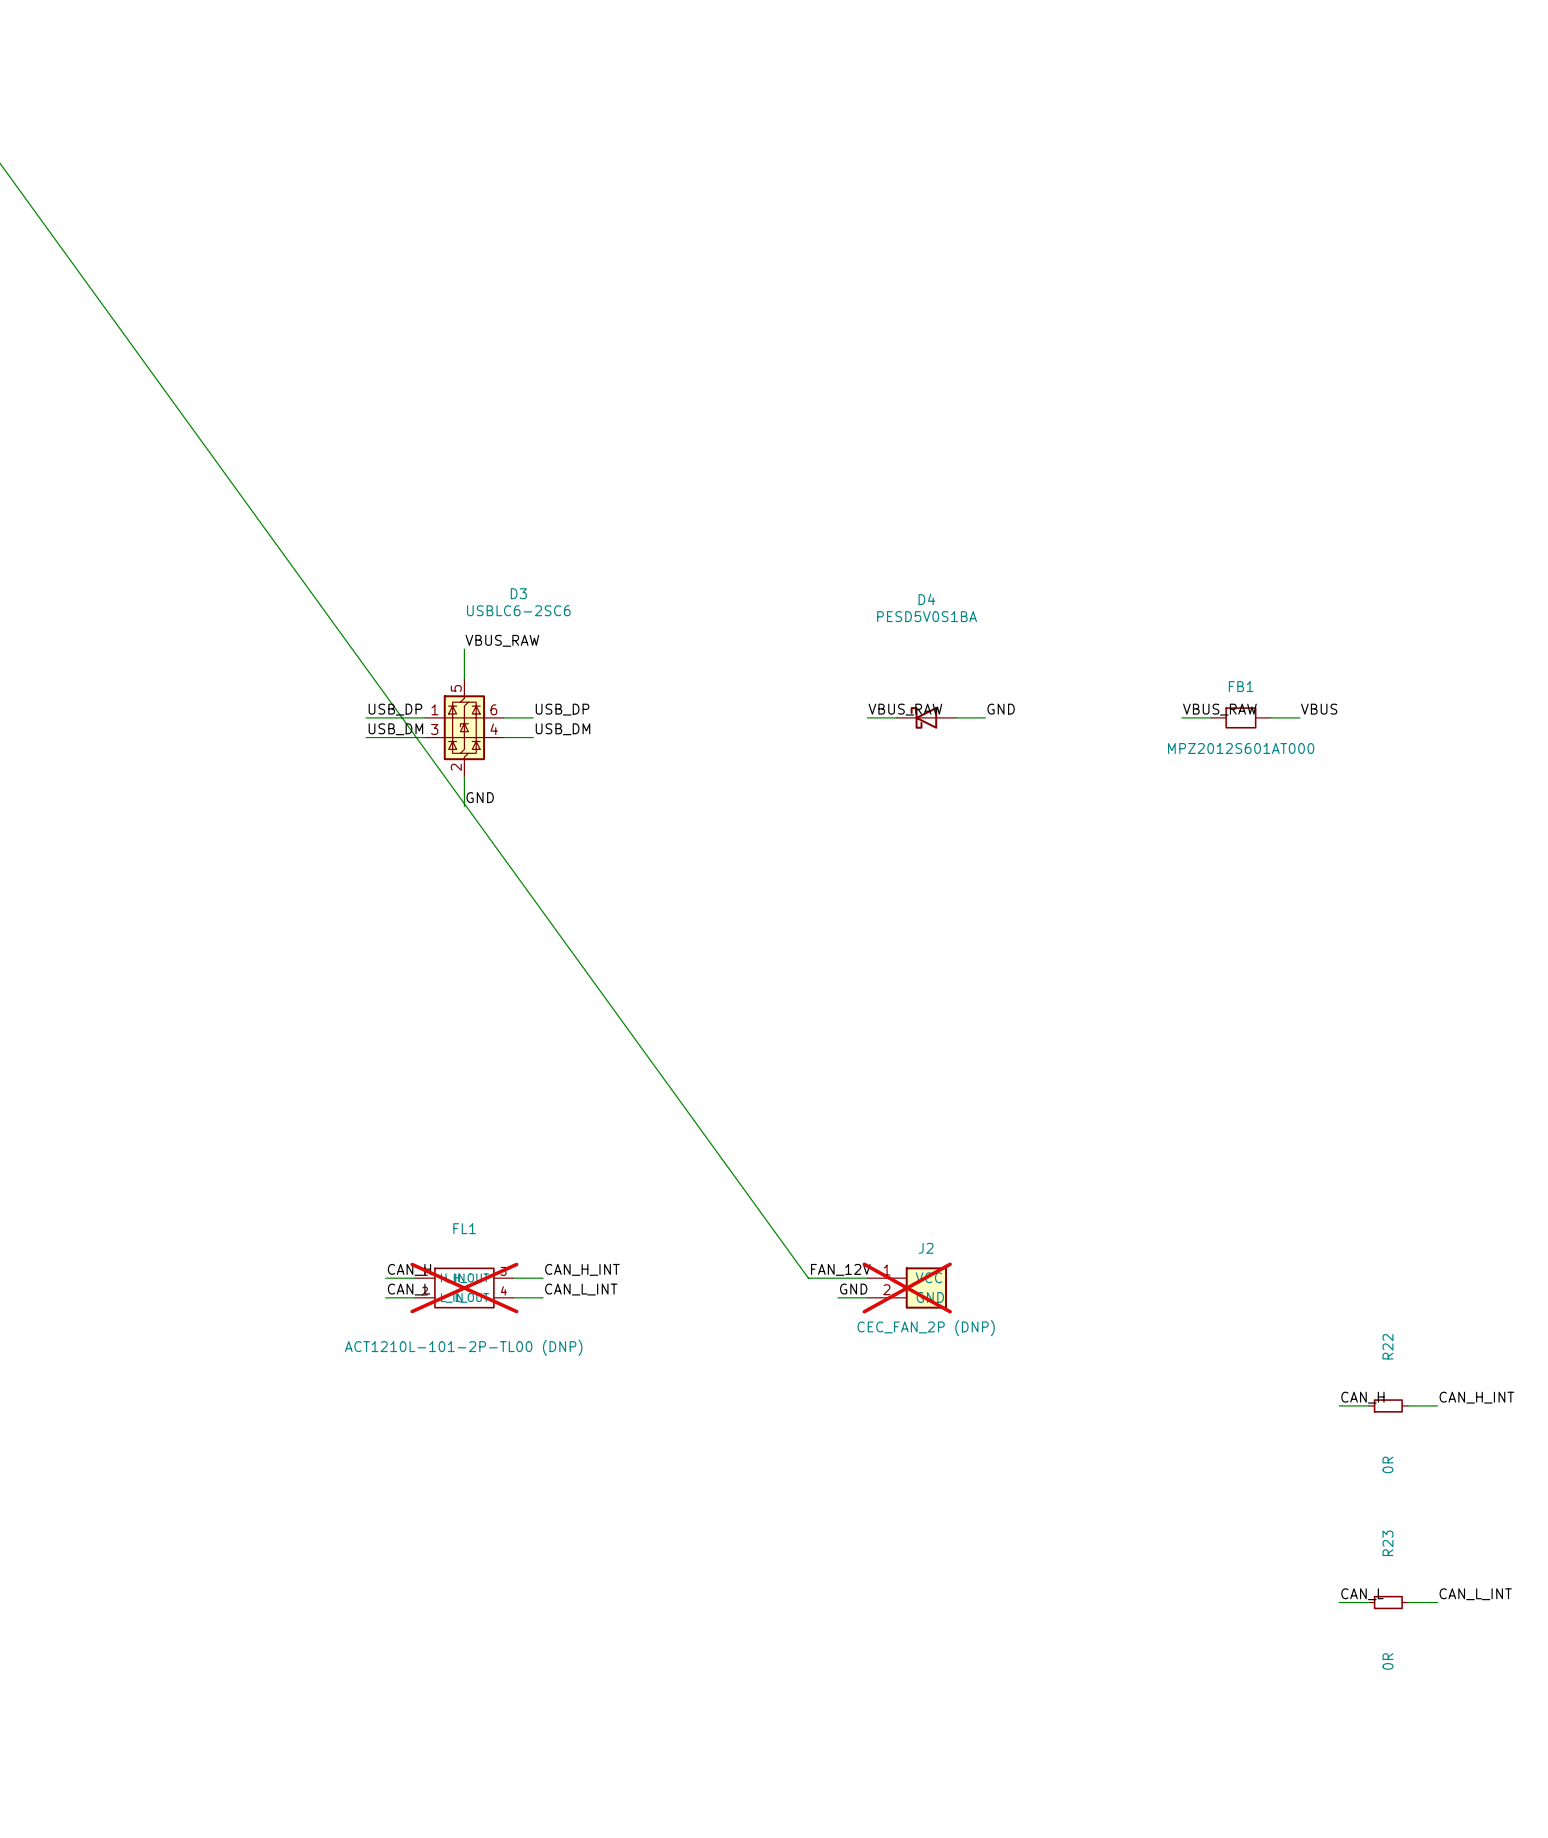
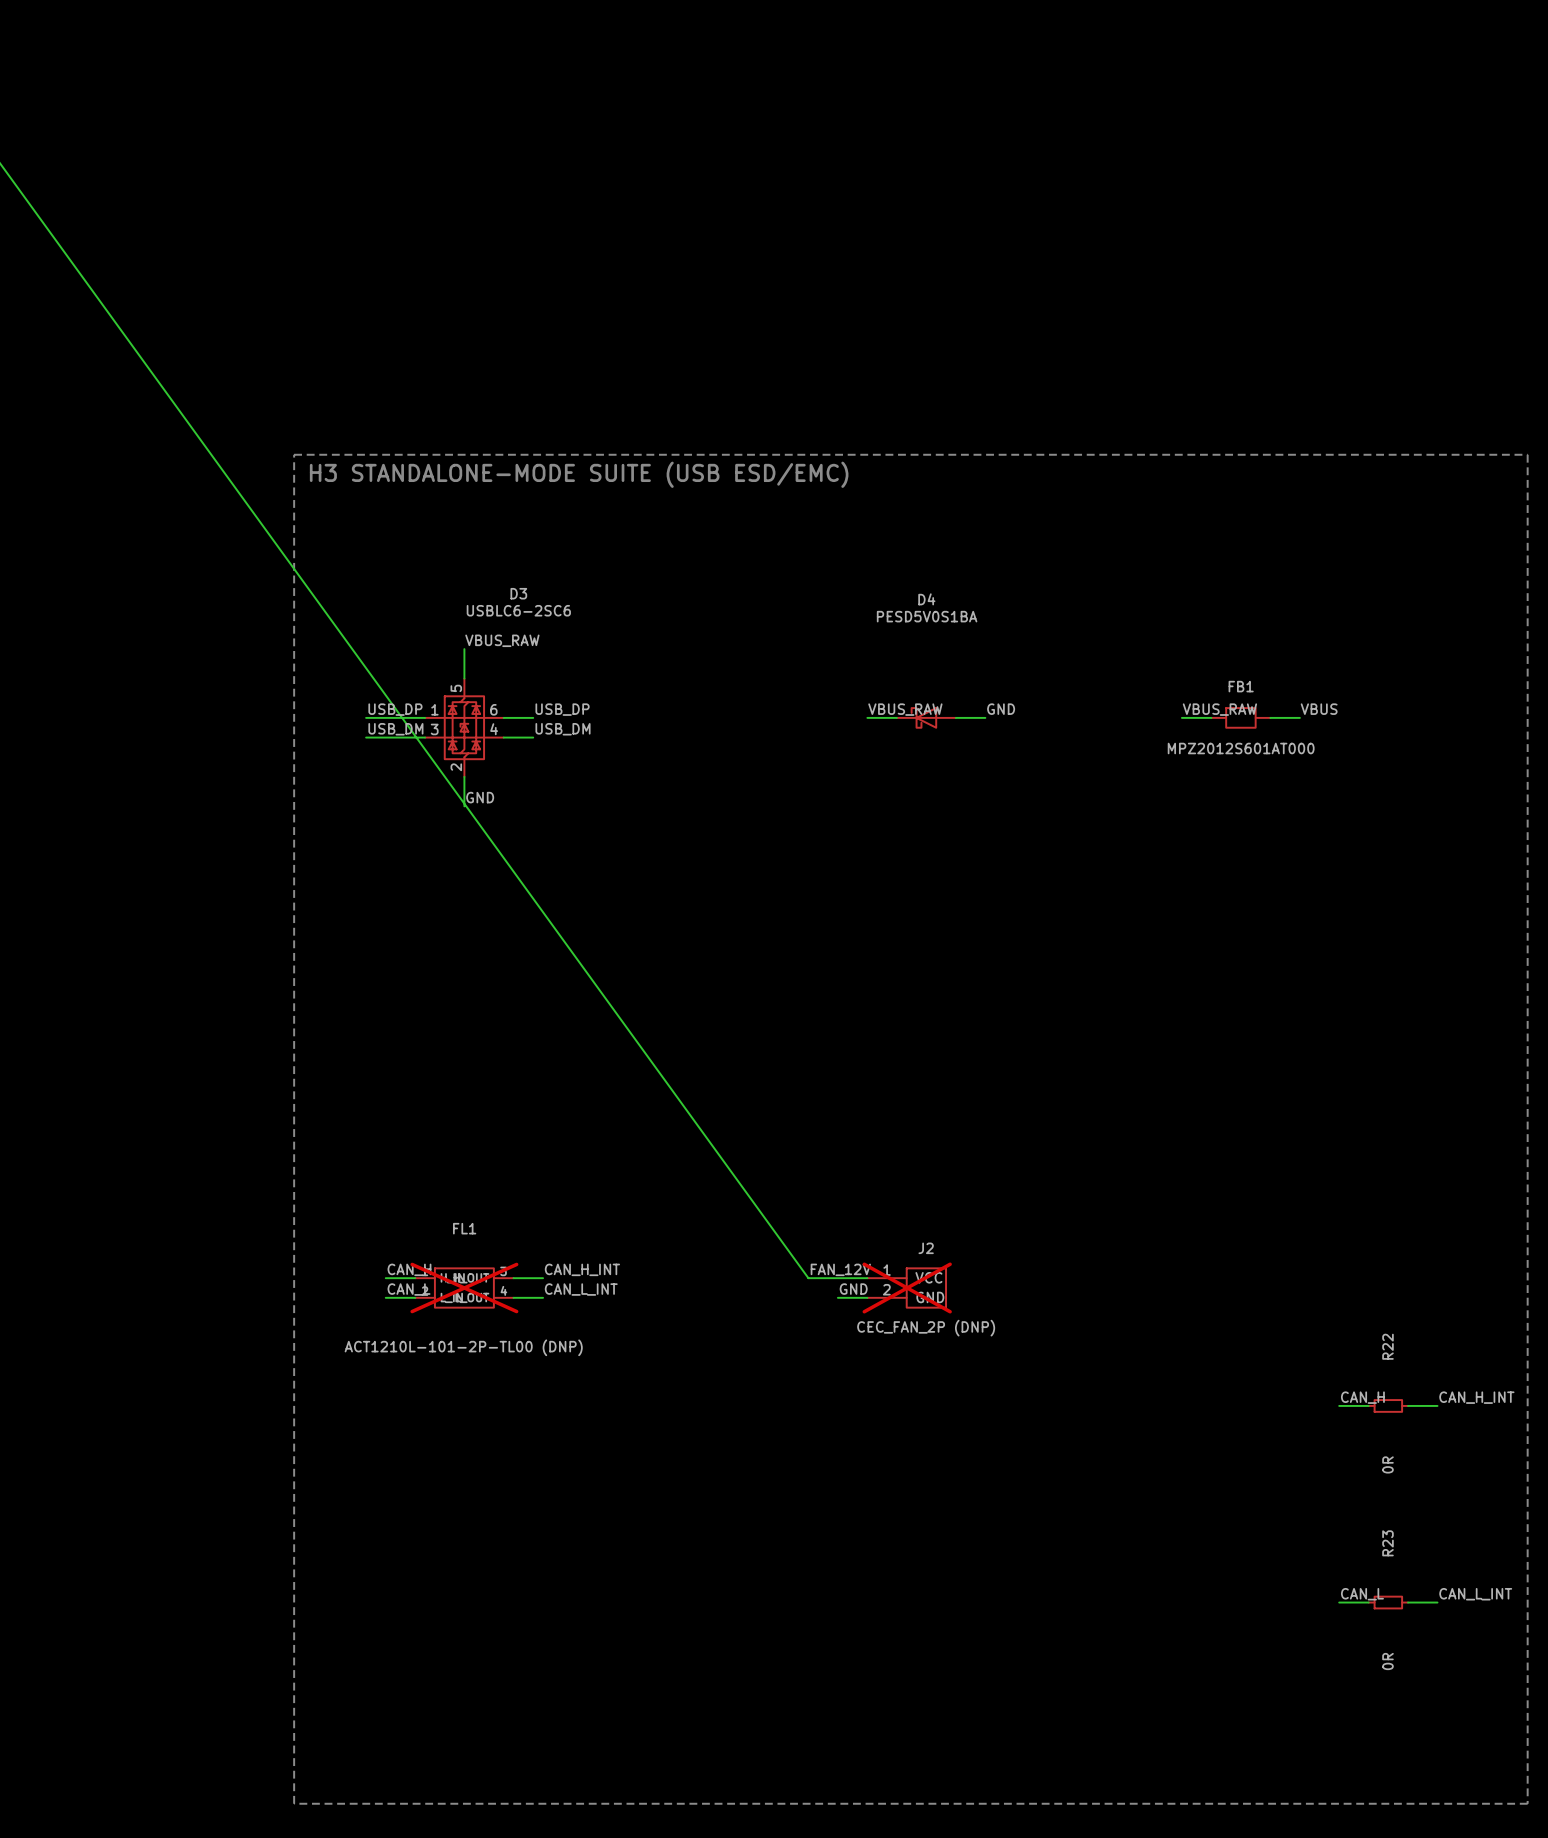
line: none -> (294, 454) (1527, 454) (1527, 1803) (294, 1803) (294, 454)
text: none -> H3 STANDALONE-MODE SUITE (USB ESD/EMC) (579, 474)

